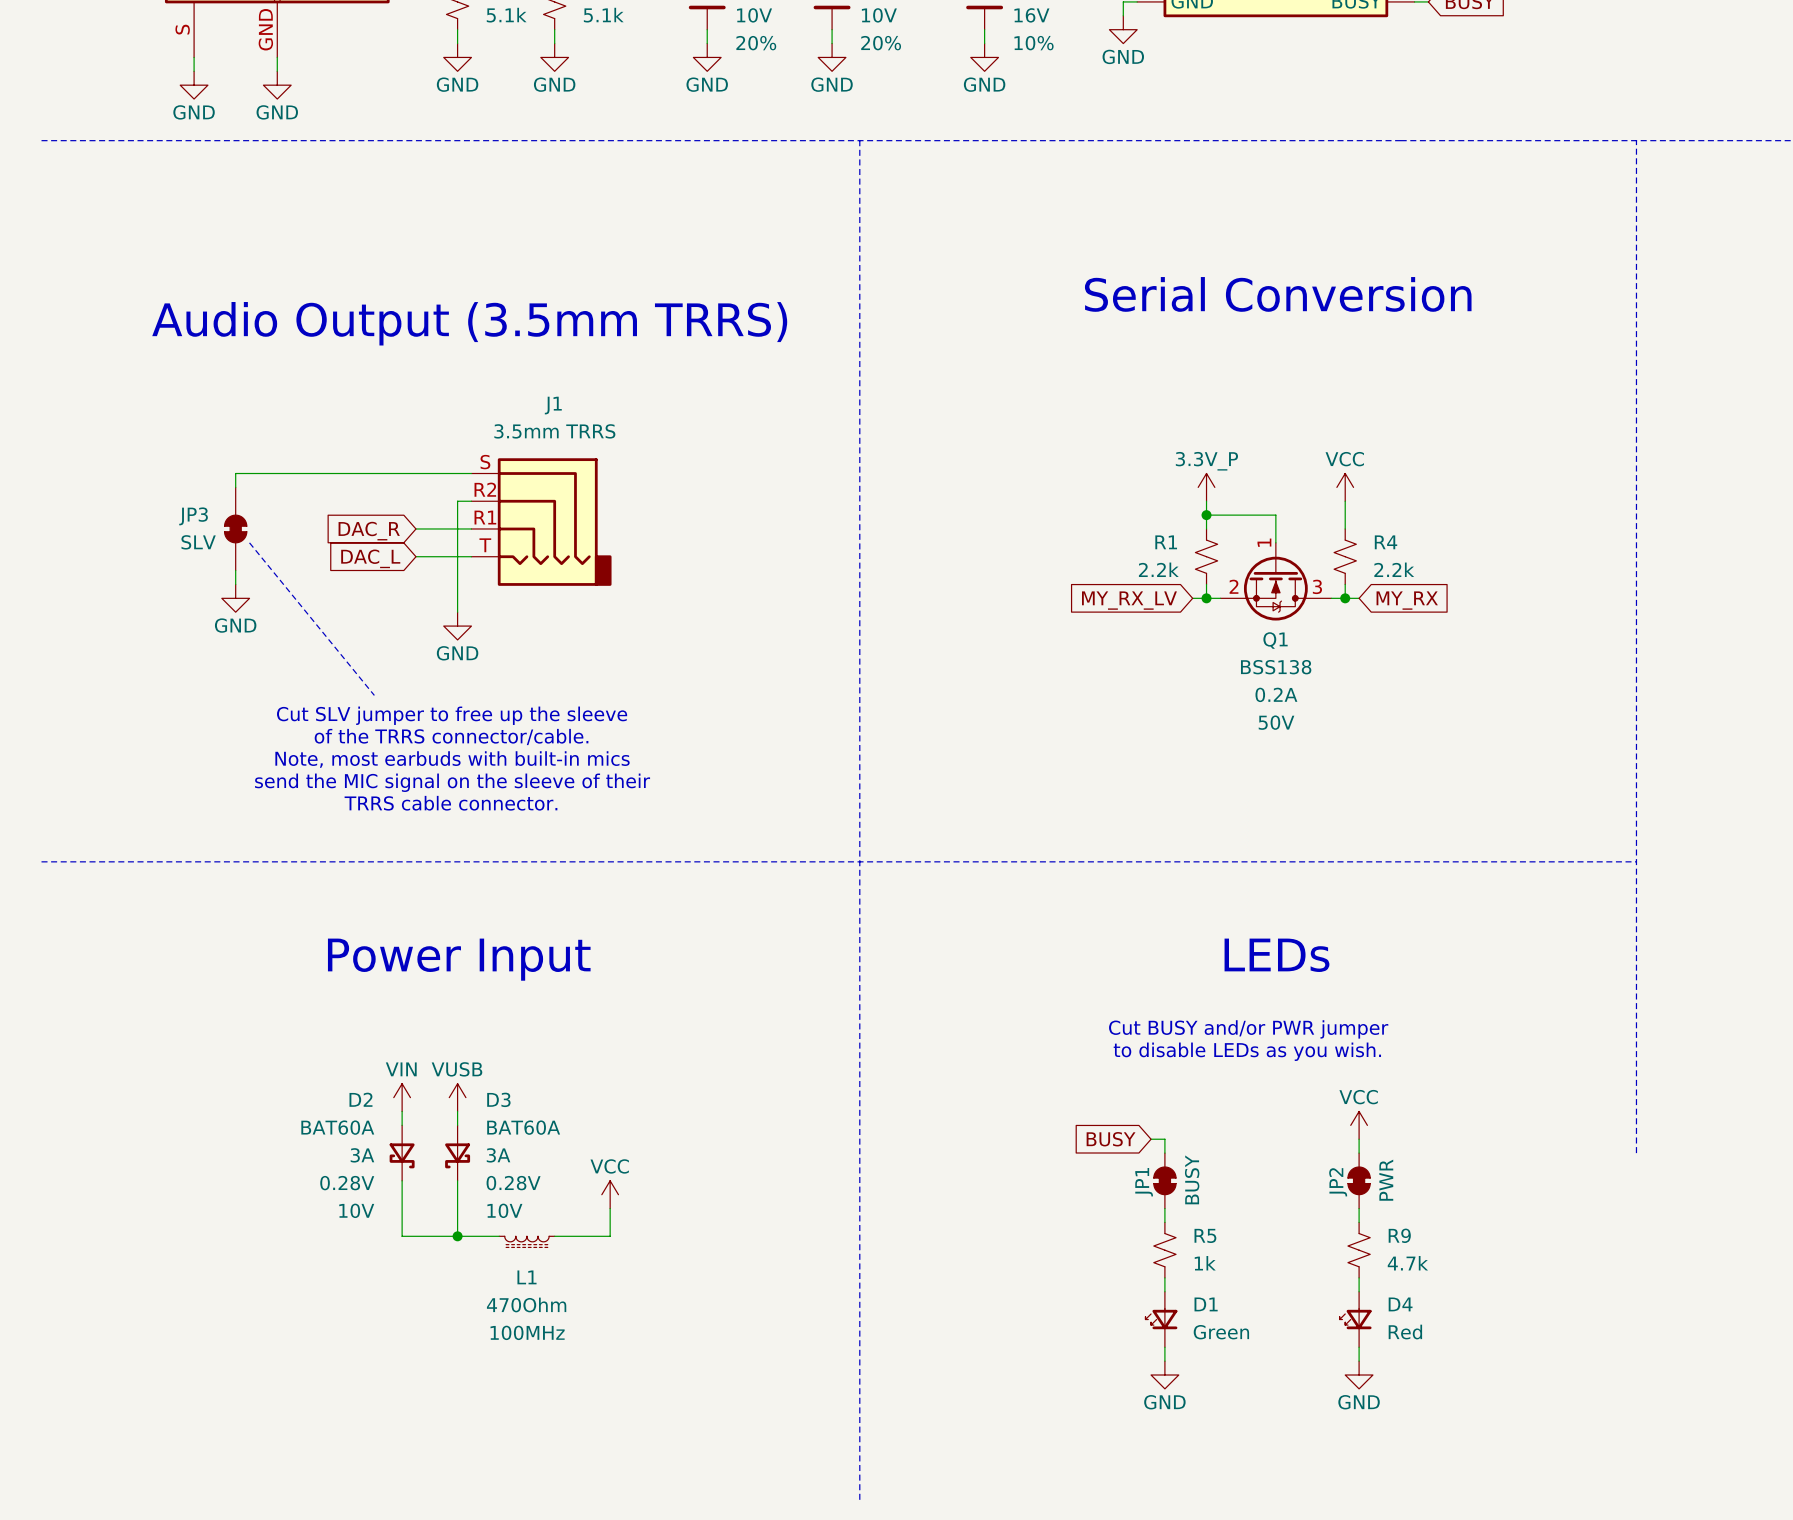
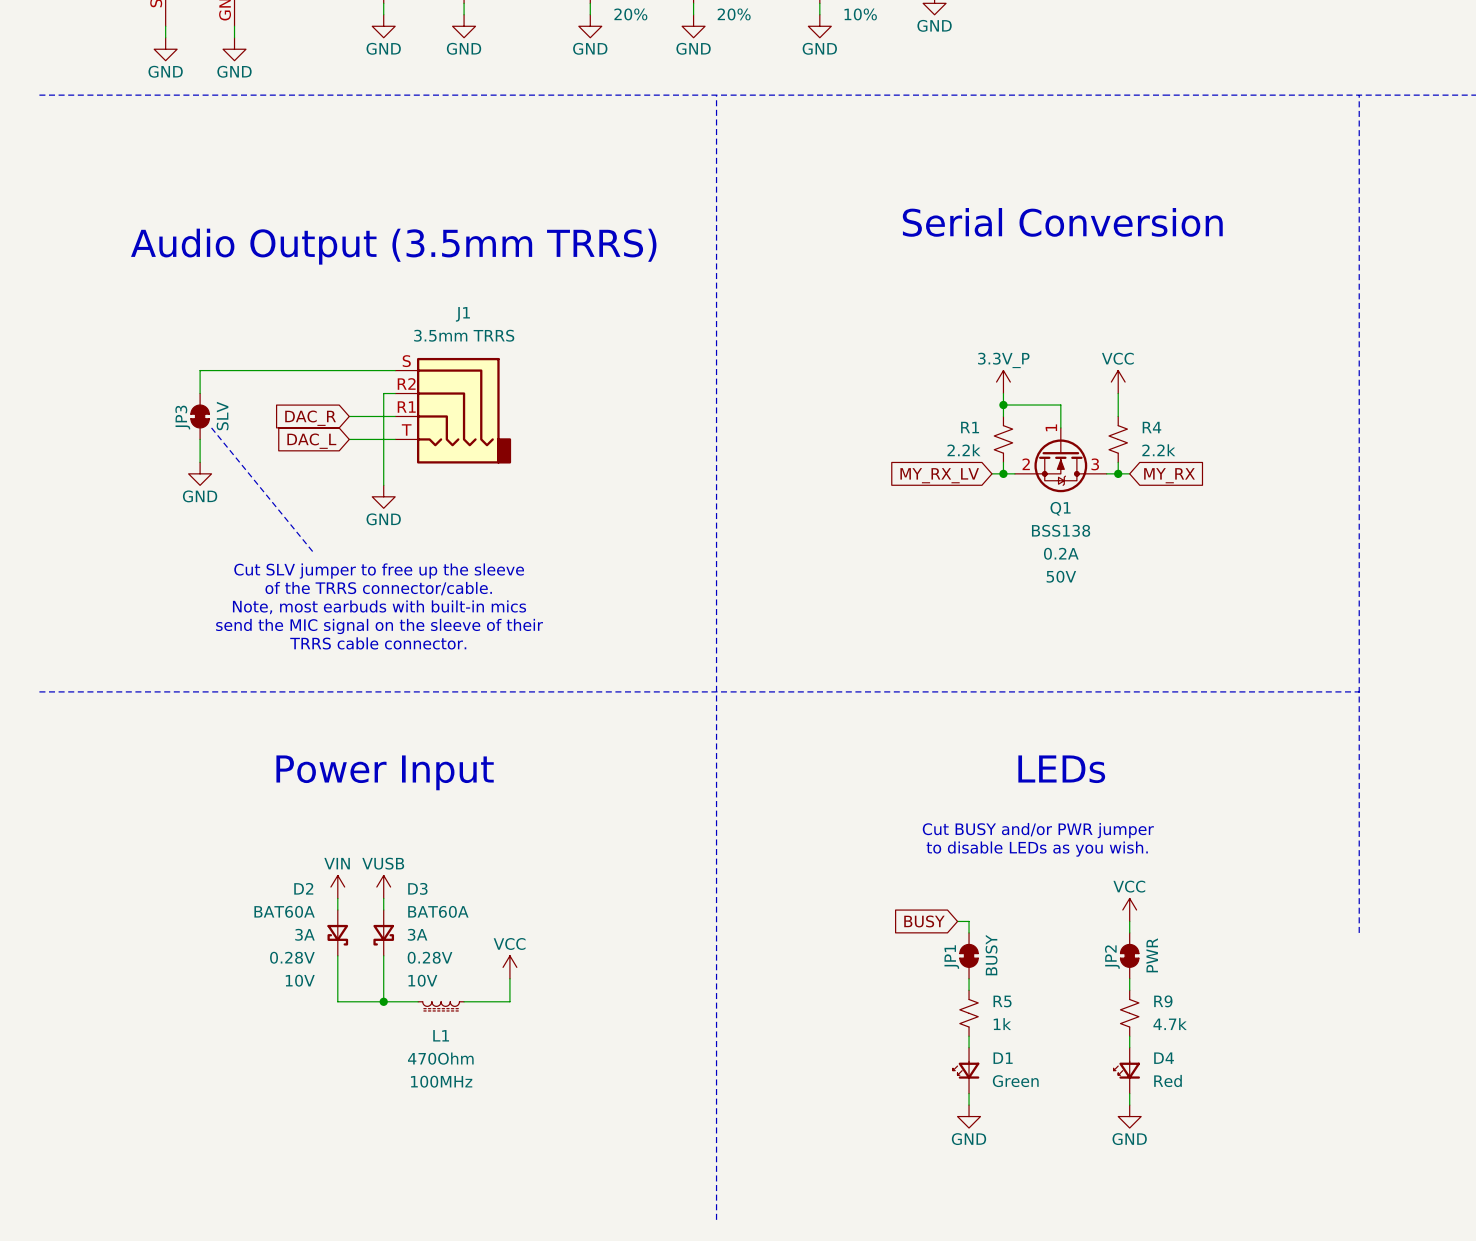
JP3 symbol: [224, 487, 247, 571] -> [190, 393, 210, 440]
JP3 value position: SLV (198, 542) -> SLV (222, 416)

